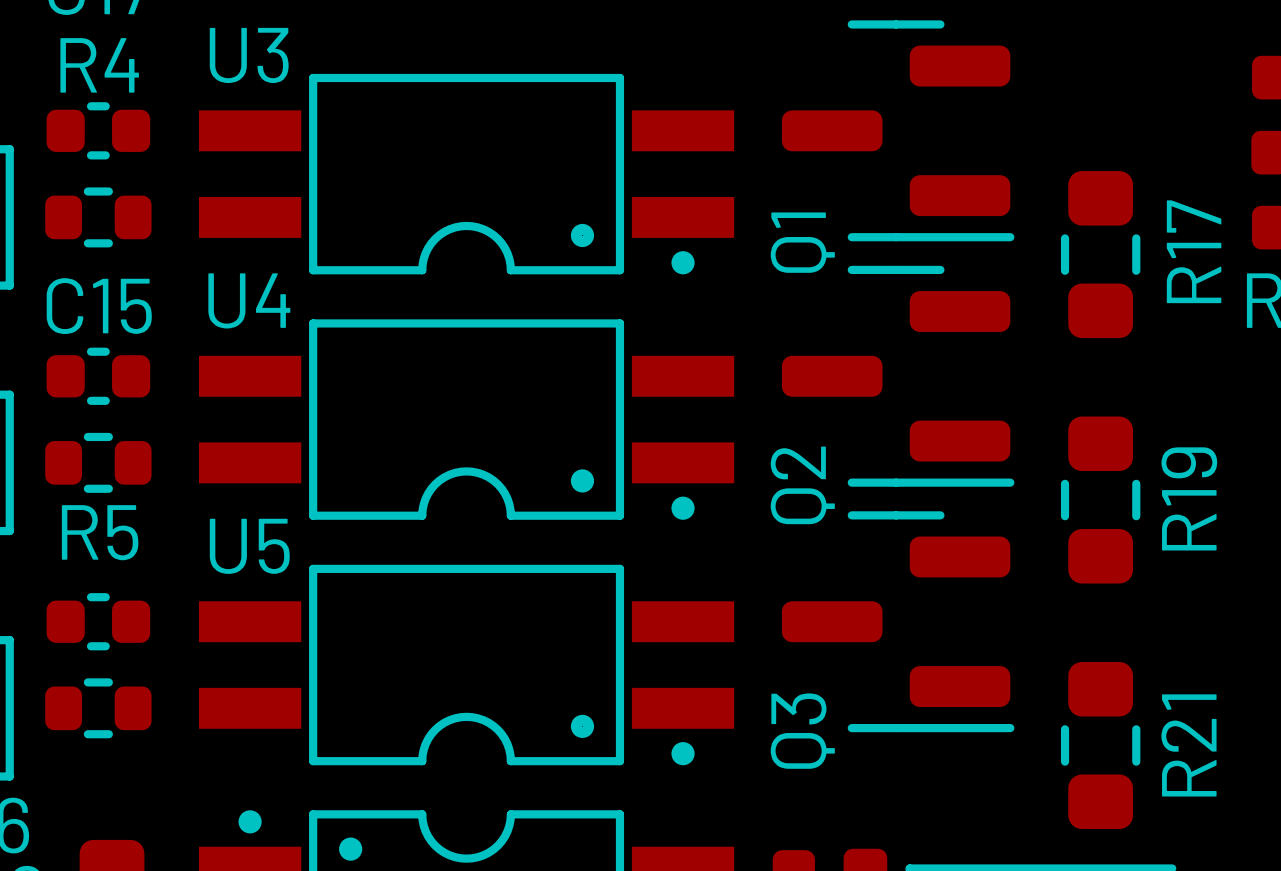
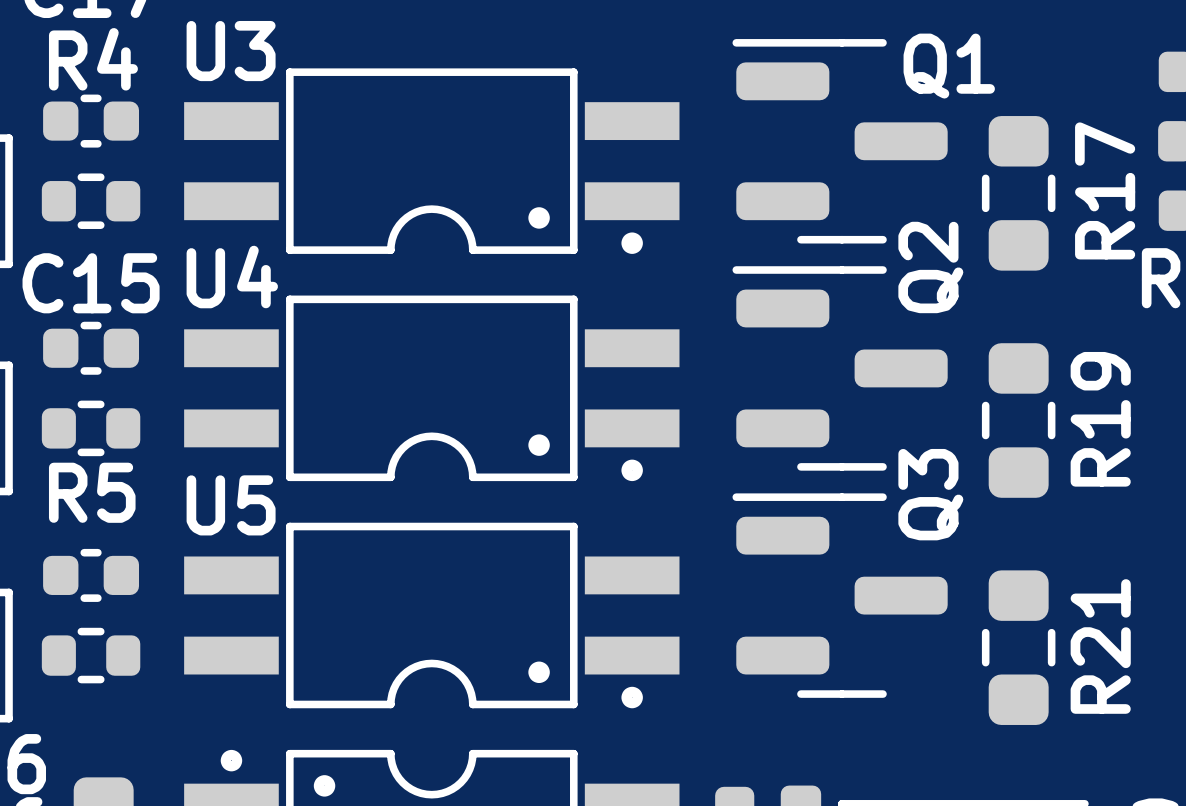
Q1 rotation: 0° (898, 130) -> 180° (840, 141)
R17 position: (1100, 254) -> (1018, 193)
Q2 rotation: 0° (898, 376) -> 180° (840, 368)
R19 position: (1100, 500) -> (1018, 420)
Q3 rotation: 0° (898, 621) -> 180° (840, 595)
R21 position: (1100, 745) -> (1018, 647)

